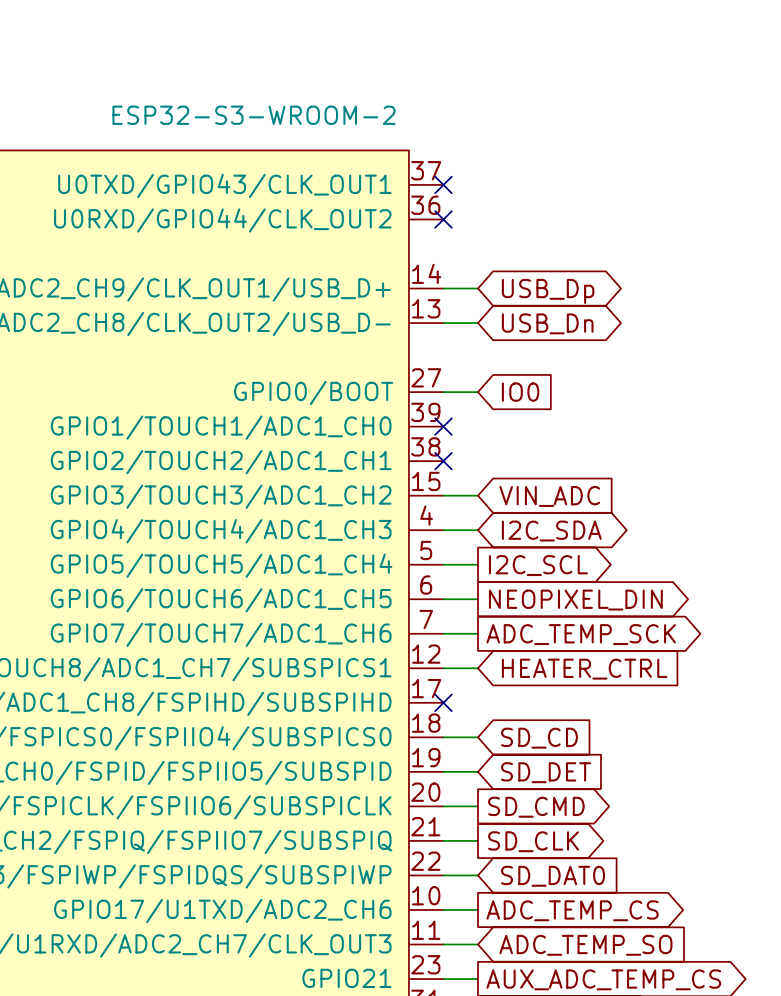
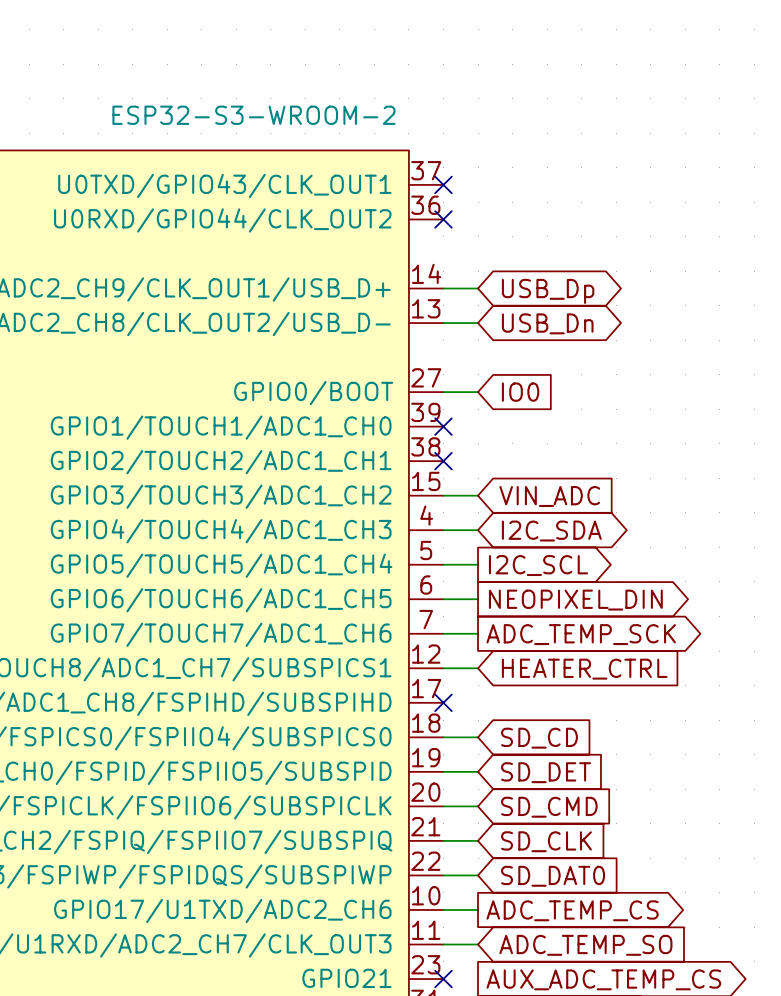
global label shape: output (536, 807) -> input (549, 807)
global label shape: output (533, 841) -> input (546, 841)
wire: (443, 979) (478, 979) -> none
no-connect mark: none -> (443, 979)

